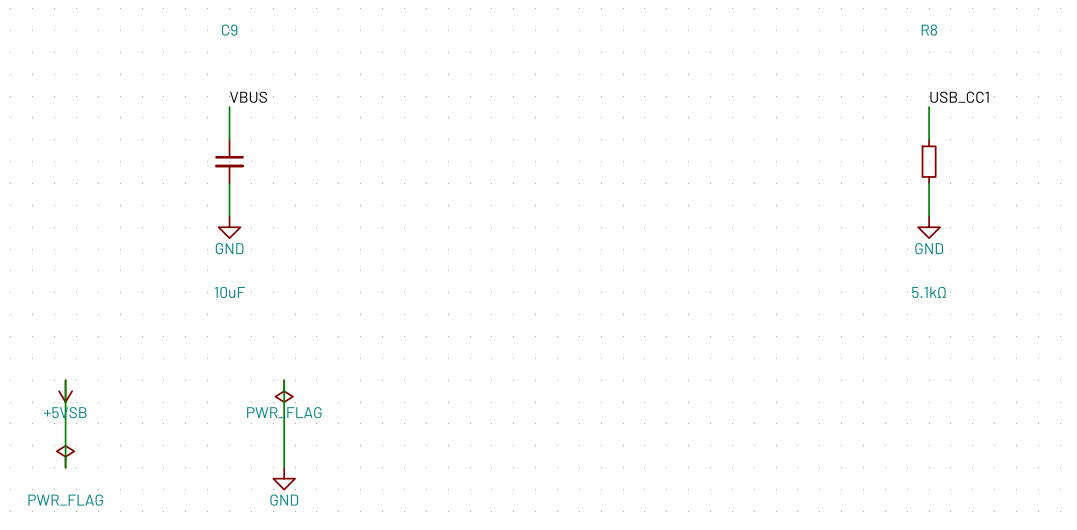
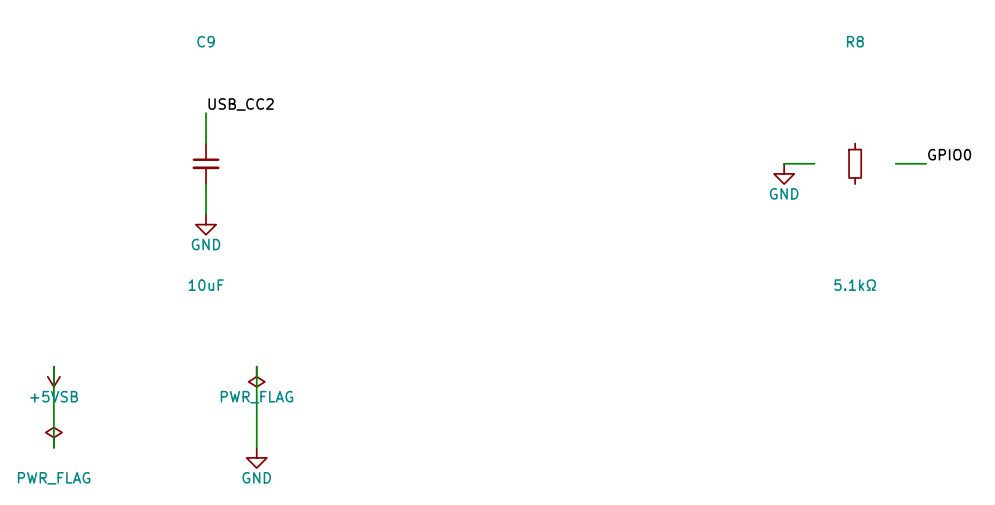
label: VBUS (248, 97) -> USB_CC2 (241, 104)
label: USB_CC1 (959, 97) -> none
wire: (929, 107) (929, 139) -> none
label: none -> GPIO0 (949, 154)
wire: none -> (784, 163) (814, 163)
wire: none -> (895, 163) (926, 163)
wire: (929, 183) (929, 216) -> none
power symbol position: GND (929, 227) -> GND (784, 173)

